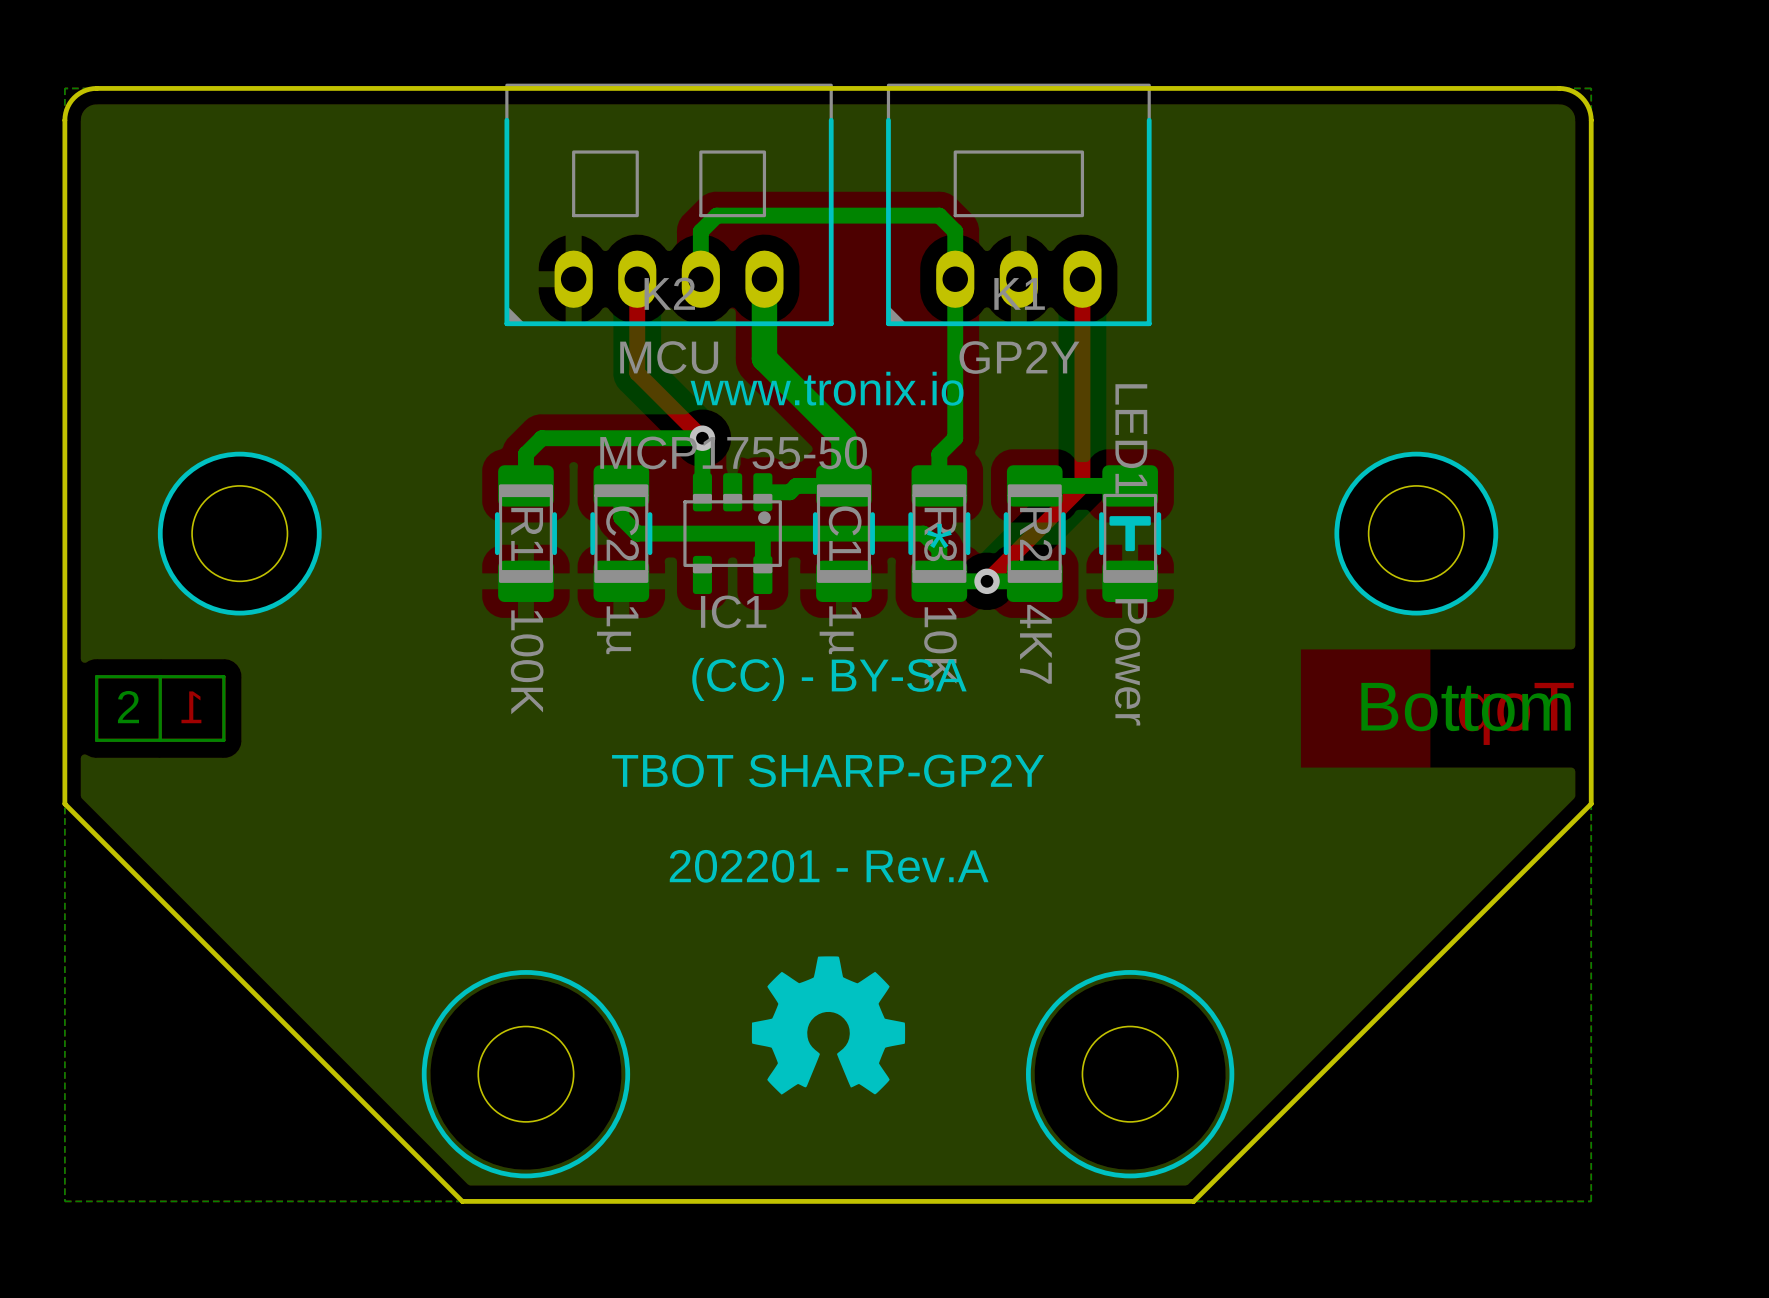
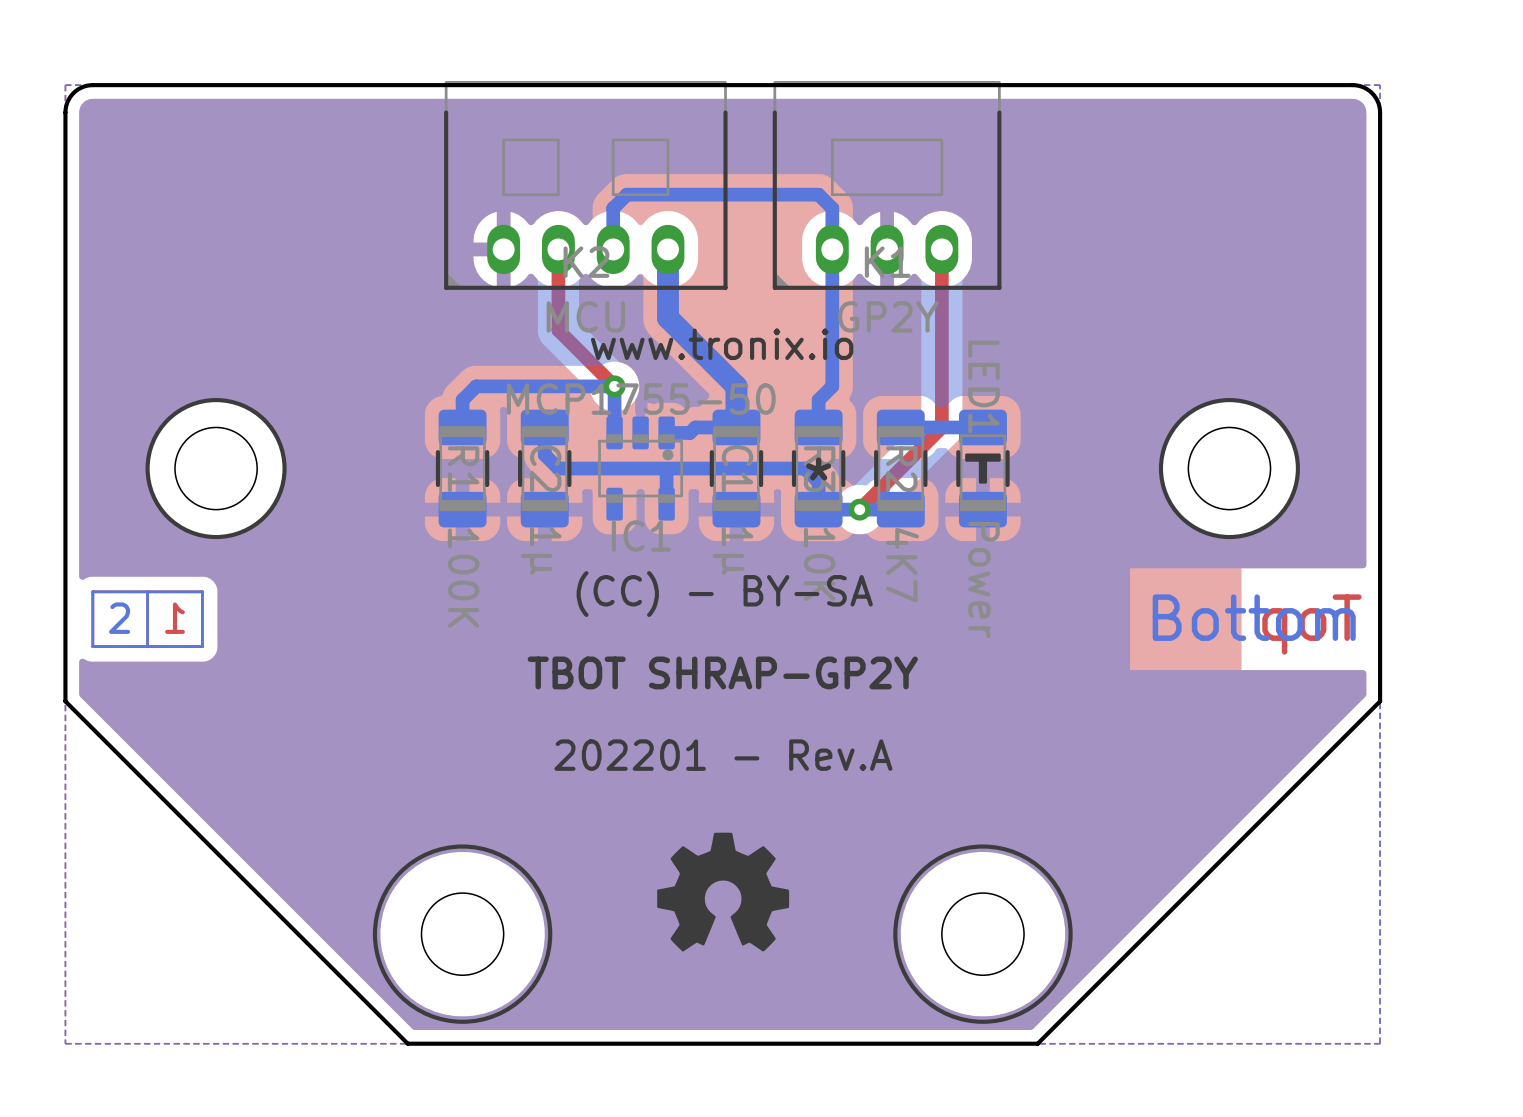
text: TBOT SHARP-GP2Y (828, 770) -> TBOT SHRAP-GP2Y (722, 672)

